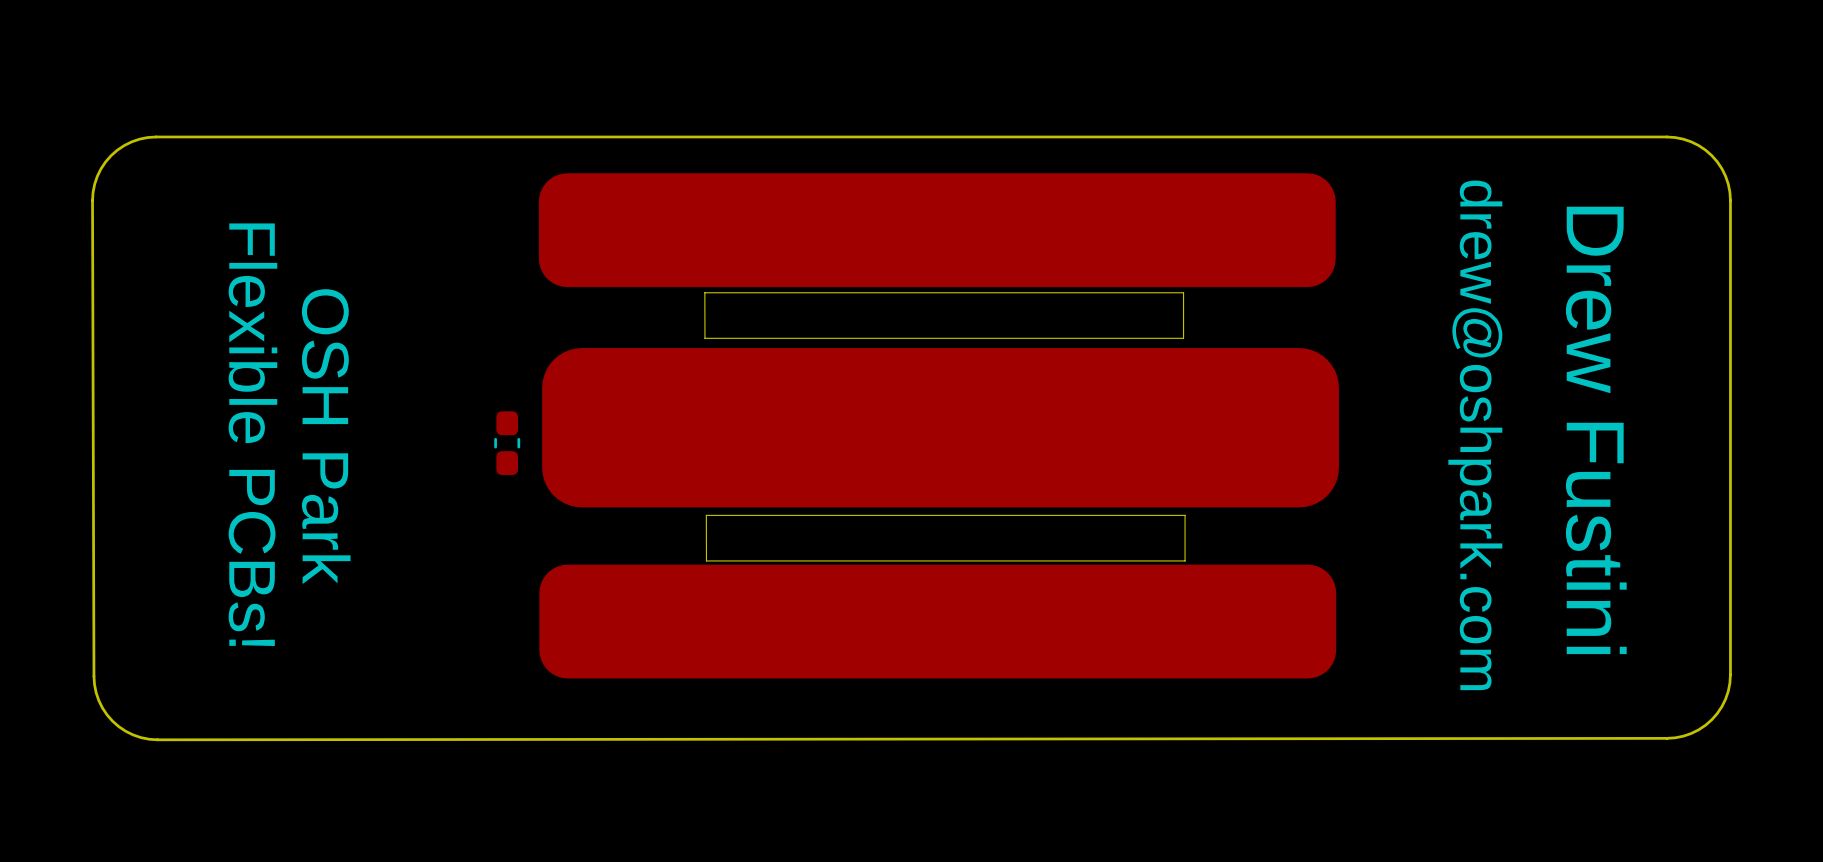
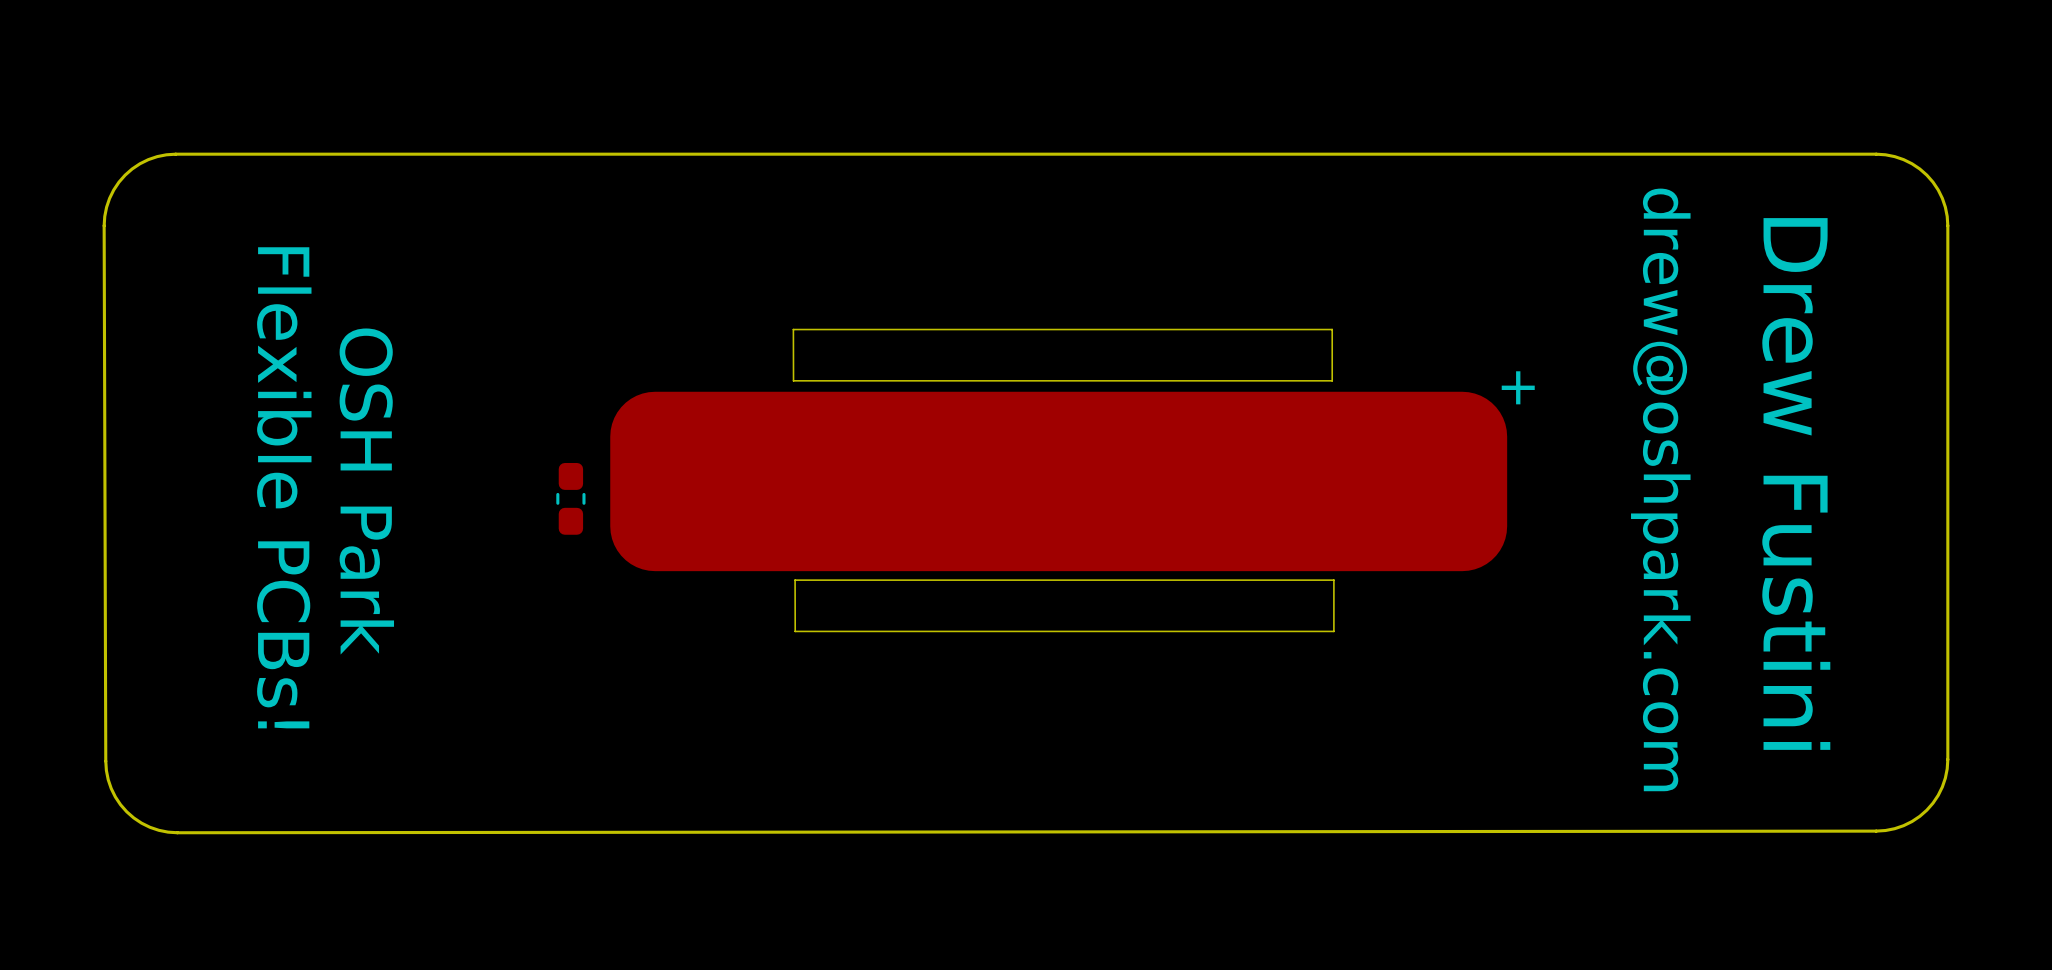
part: (937, 230) -> none
text: none -> + (1518, 387)
part: (937, 621) -> none

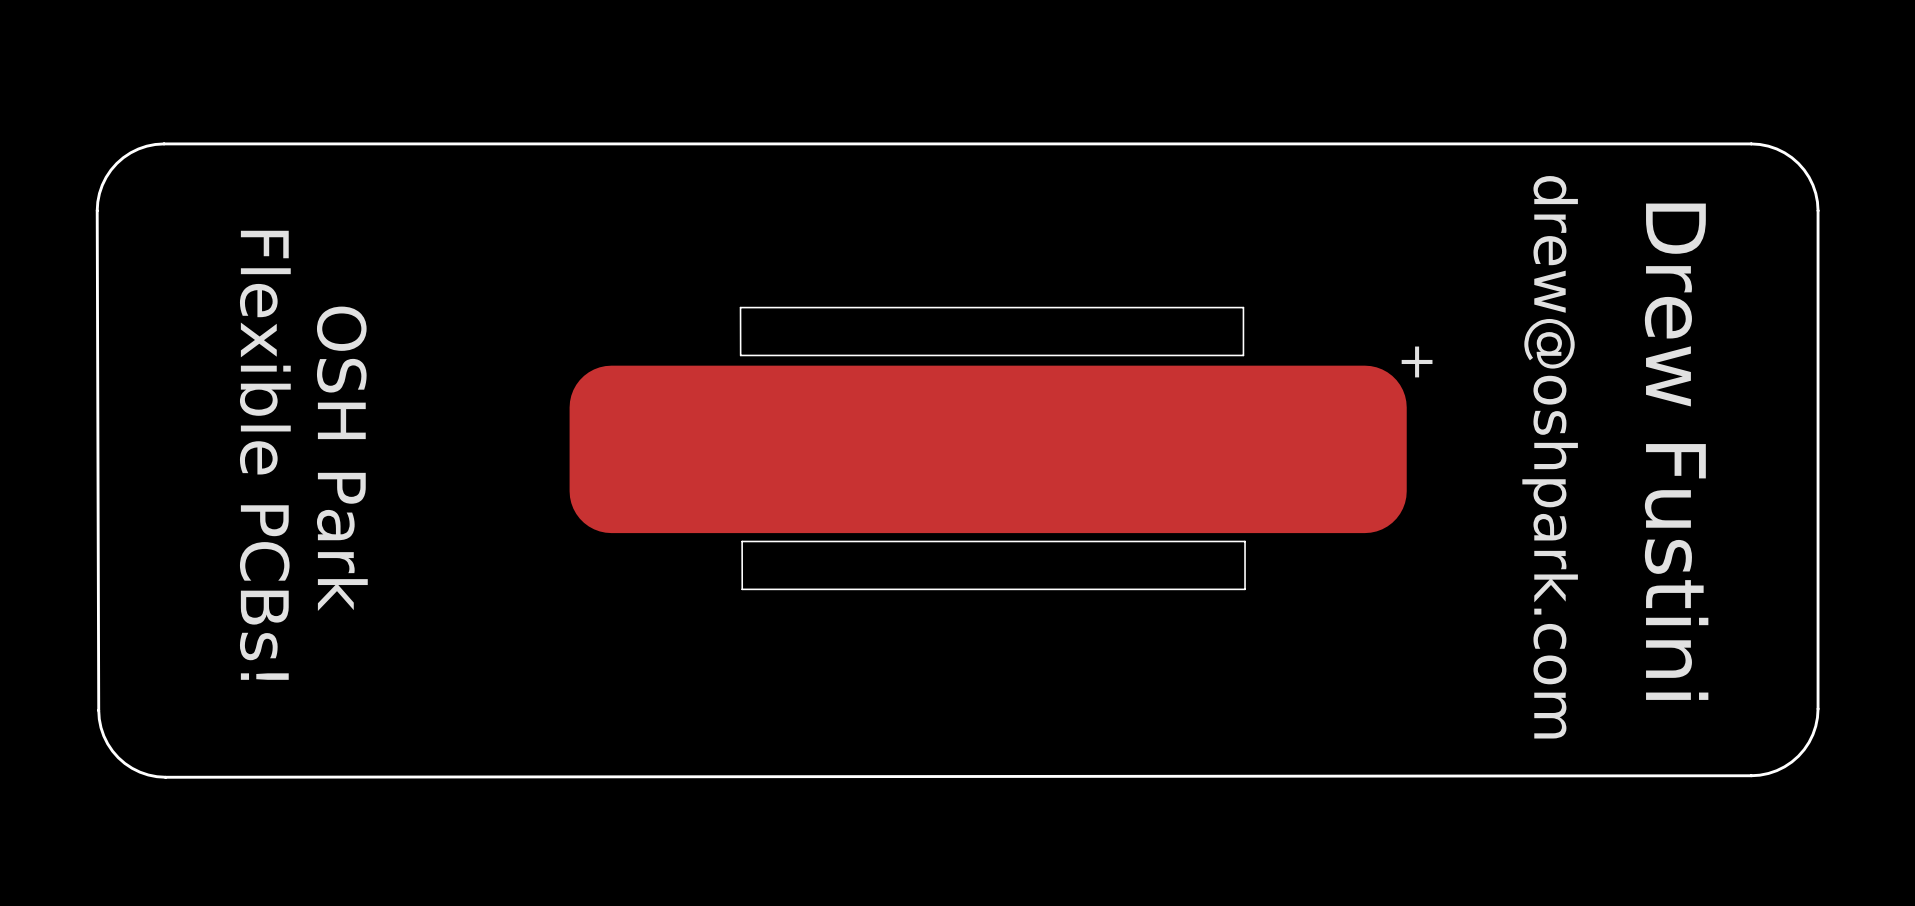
part: (570, 498) -> none

